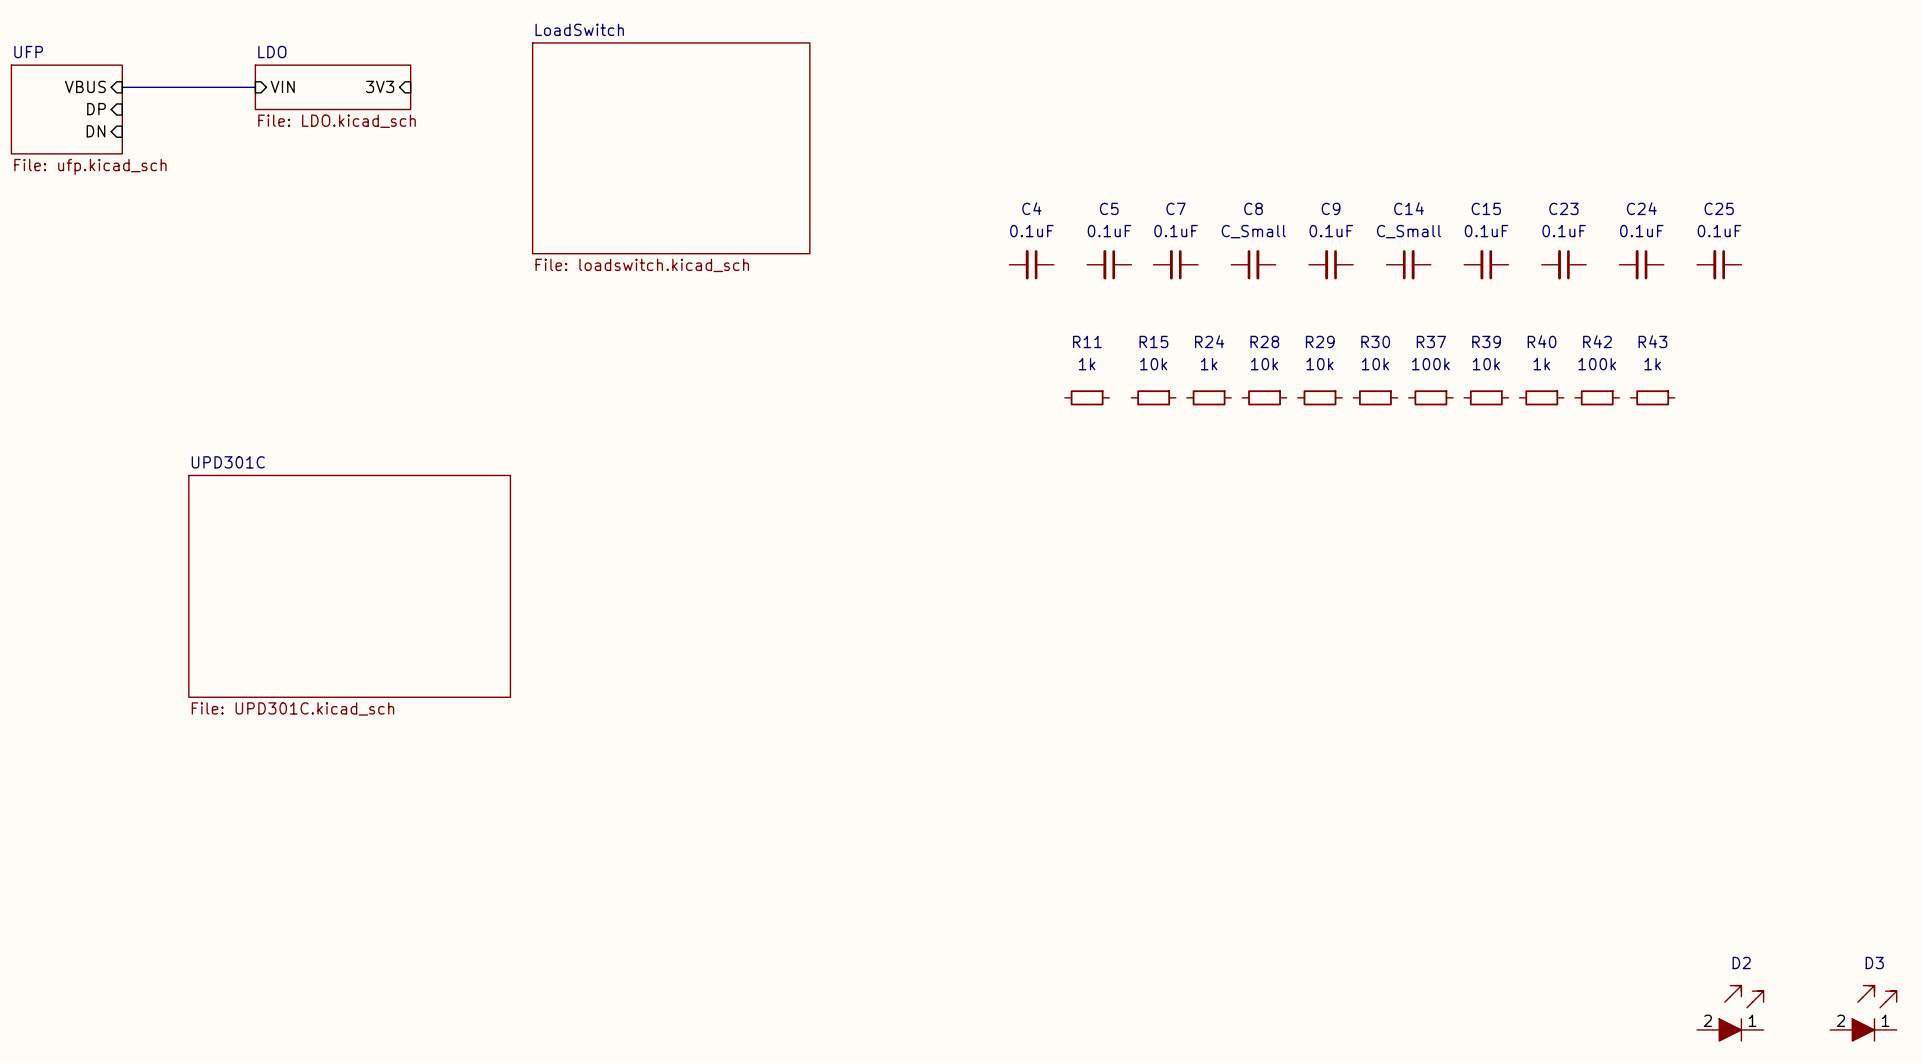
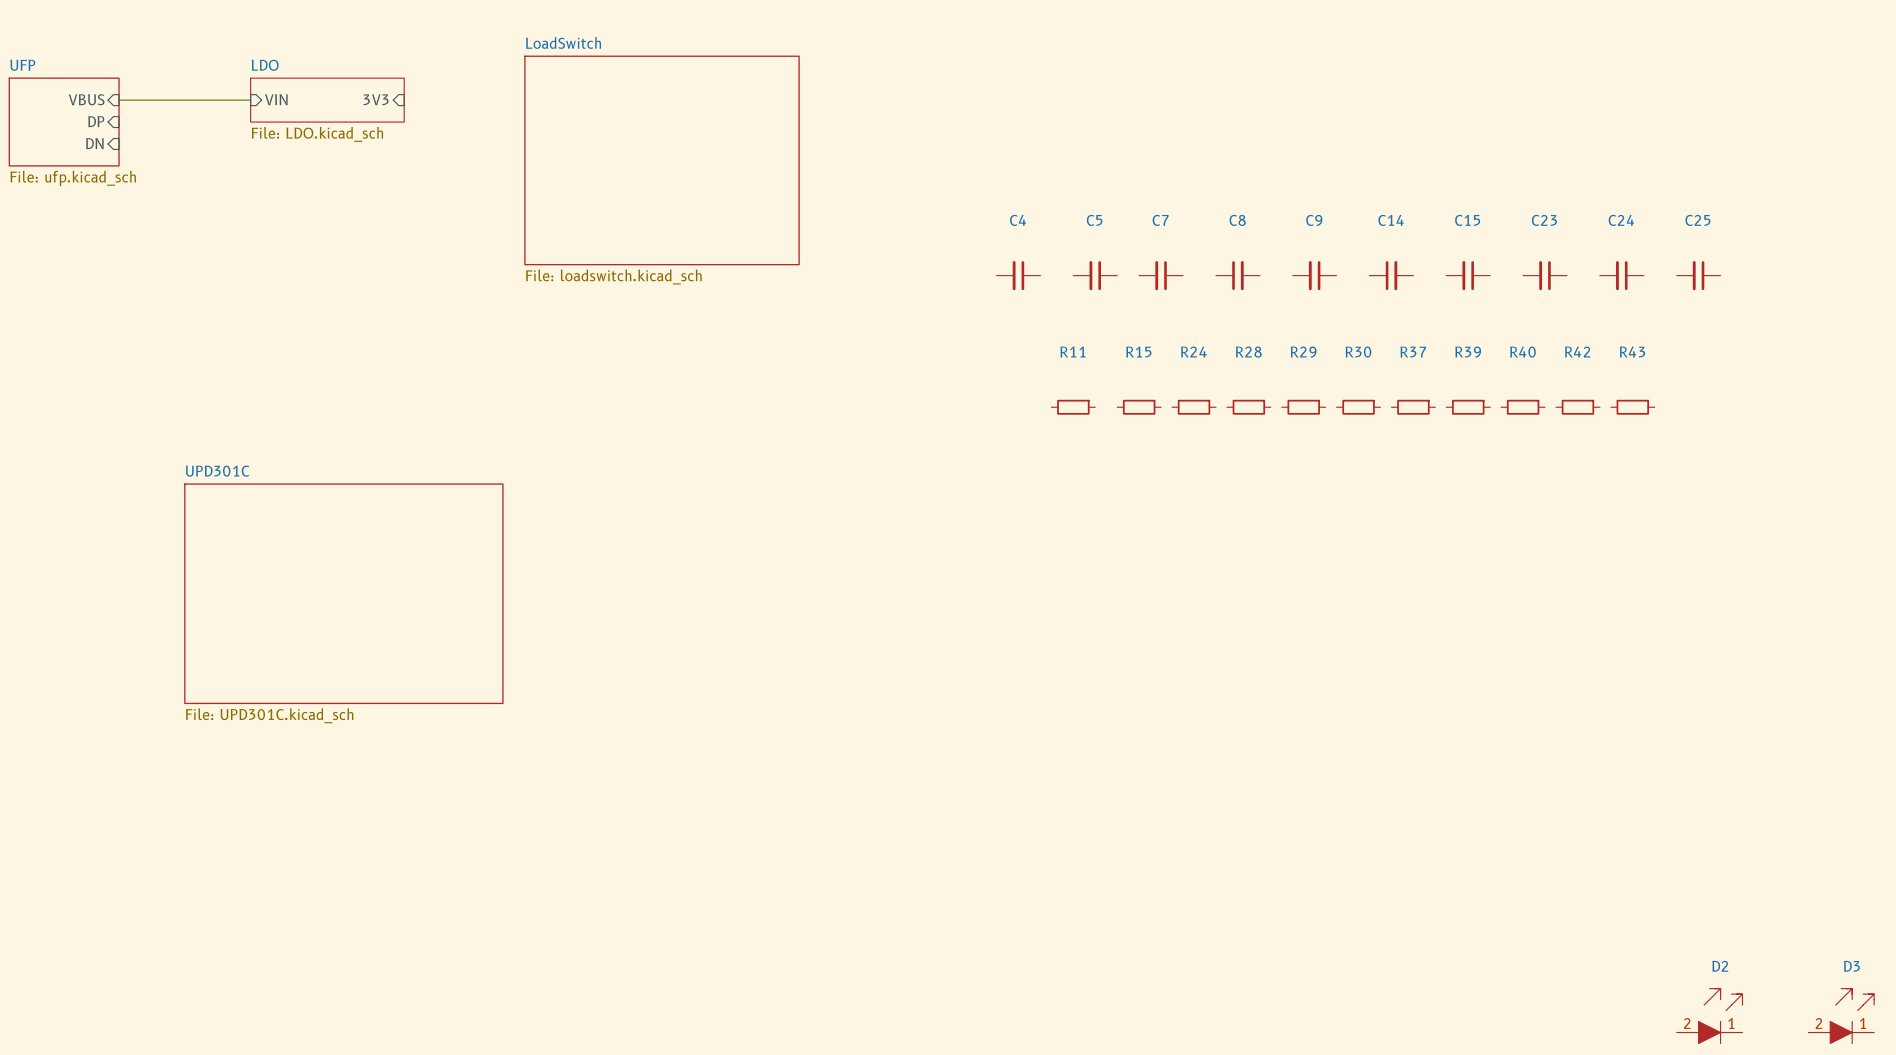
C4 value: 0.1uF (1031, 231) -> none
C5 value: 0.1uF (1109, 231) -> none
C7 value: 0.1uF (1176, 231) -> none
C8 value: C_Small (1253, 231) -> none
C9 value: 0.1uF (1331, 231) -> none
C14 value: C_Small (1409, 231) -> none
C15 value: 0.1uF (1486, 231) -> none
C23 value: 0.1uF (1564, 231) -> none
C24 value: 0.1uF (1641, 231) -> none
C25 value: 0.1uF (1719, 231) -> none
R11 value: 1k (1087, 364) -> none
R15 value: 10k (1153, 364) -> none
R24 value: 1k (1209, 364) -> none
R28 value: 10k (1264, 364) -> none
R29 value: 10k (1319, 364) -> none
R30 value: 10k (1375, 364) -> none
R37 value: 100k (1430, 364) -> none
R39 value: 10k (1486, 364) -> none
R40 value: 1k (1541, 364) -> none
R42 value: 100k (1597, 364) -> none
R43 value: 1k (1652, 364) -> none

